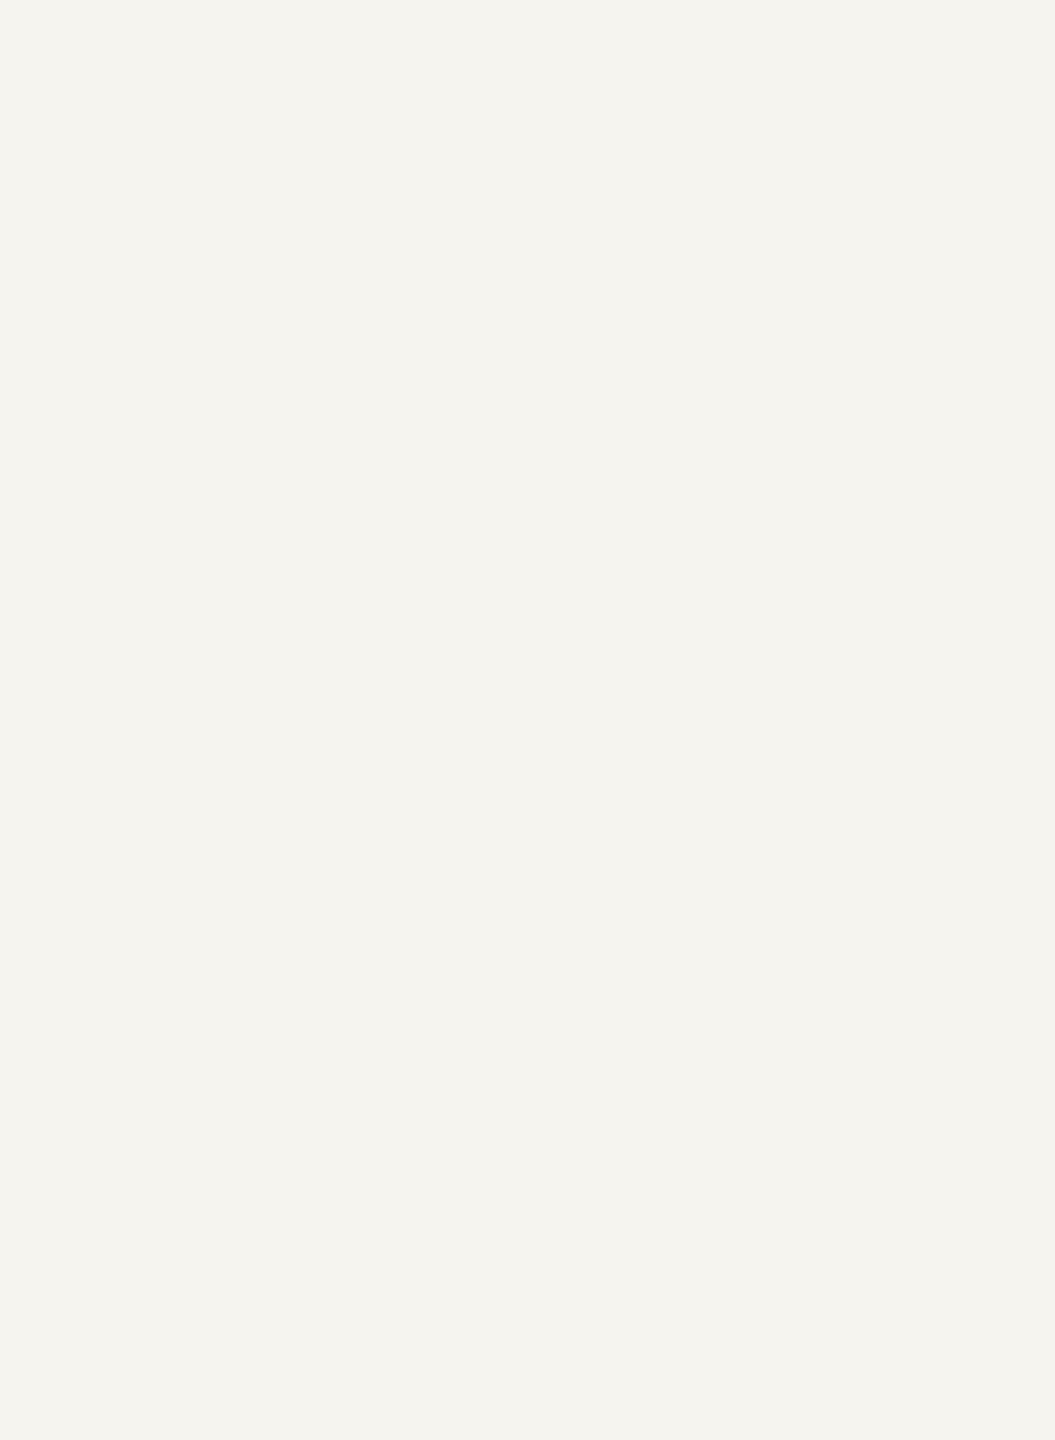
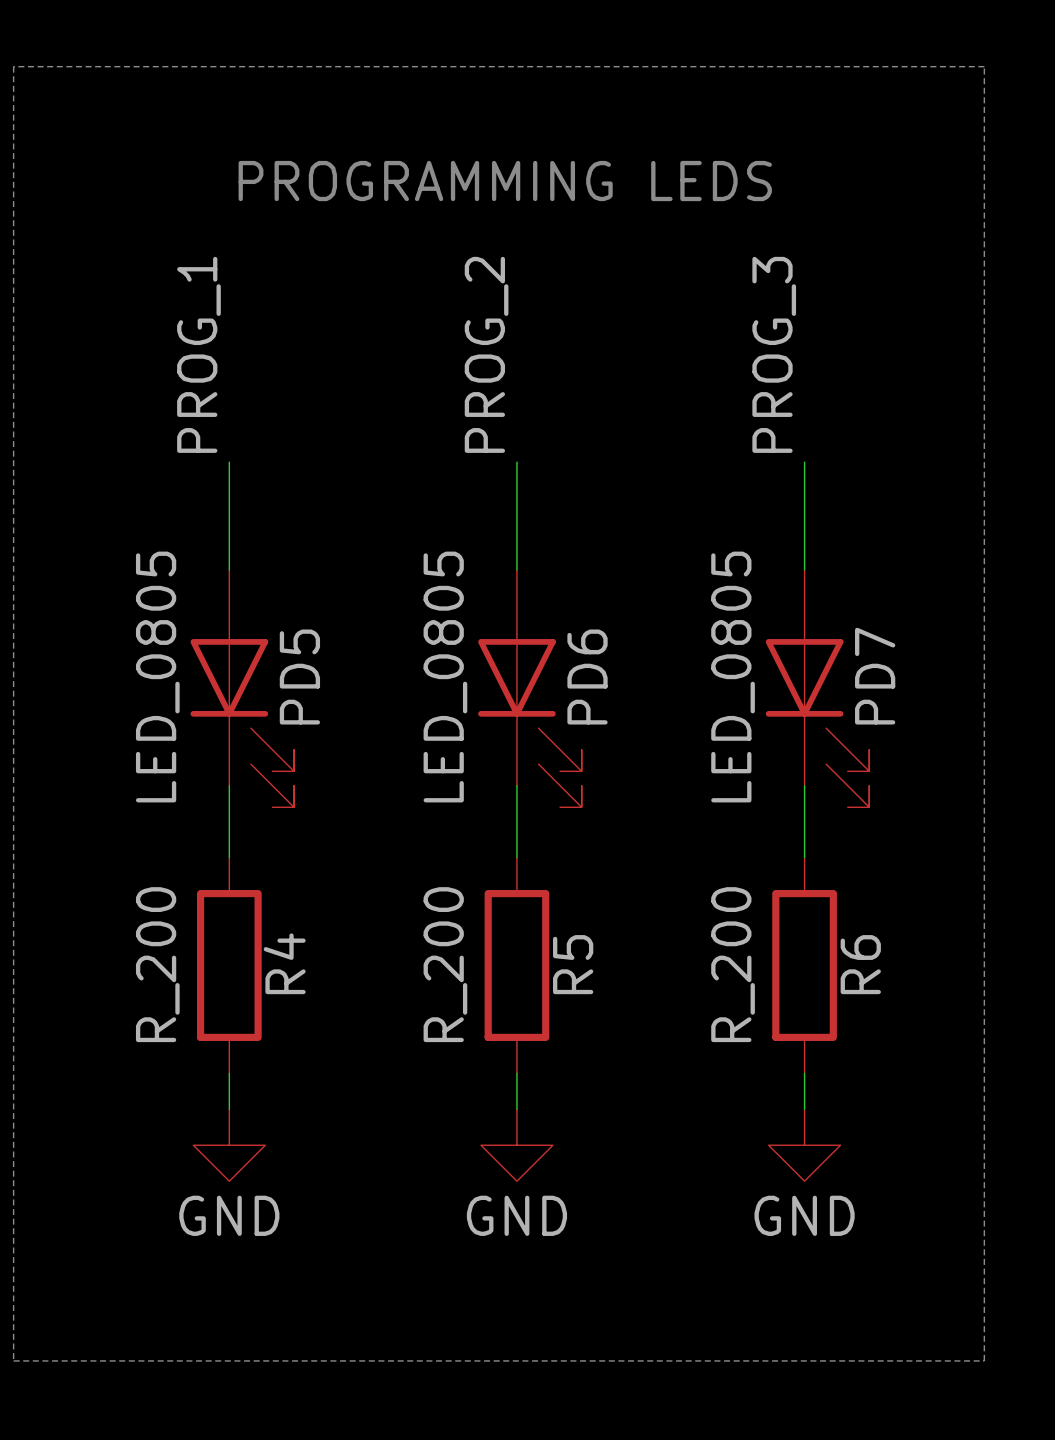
line: none -> (13, 66) (13, 1360) (984, 1360) (984, 66) (13, 66)
text: none -> PROGRAMMING LEDS (505, 181)
label: none -> PROG_1 (198, 354)
label: none -> PROG_2 (486, 354)
label: none -> PROG_3 (774, 354)
wire: none -> (229, 462) (229, 570)
wire: none -> (516, 462) (516, 570)
wire: none -> (804, 462) (804, 570)
PD5: none -> LED_0805 (242, 688)
PD6: none -> LED_0805 (529, 688)
PD7: none -> LED_0805 (817, 688)
wire: none -> (229, 785) (229, 857)
wire: none -> (516, 785) (516, 857)
wire: none -> (804, 785) (804, 857)
R4: none -> R_200 (229, 965)
R5: none -> R_200 (516, 965)
R6: none -> R_200 (804, 965)
wire: none -> (229, 1073) (229, 1109)
wire: none -> (516, 1073) (516, 1109)
wire: none -> (804, 1073) (804, 1109)
power symbol: none -> GND (229, 1145)
power symbol: none -> GND (516, 1145)
power symbol: none -> GND (804, 1145)

